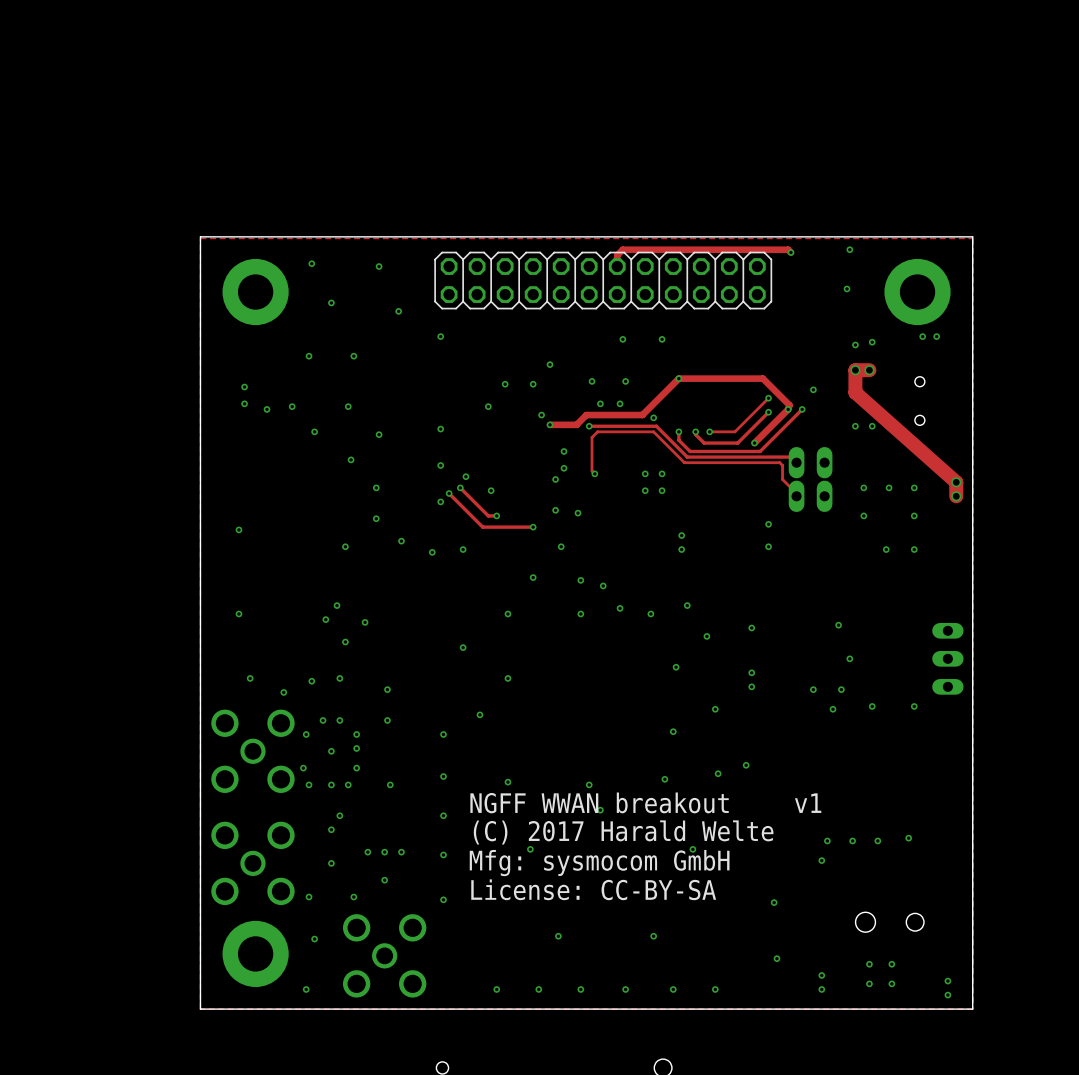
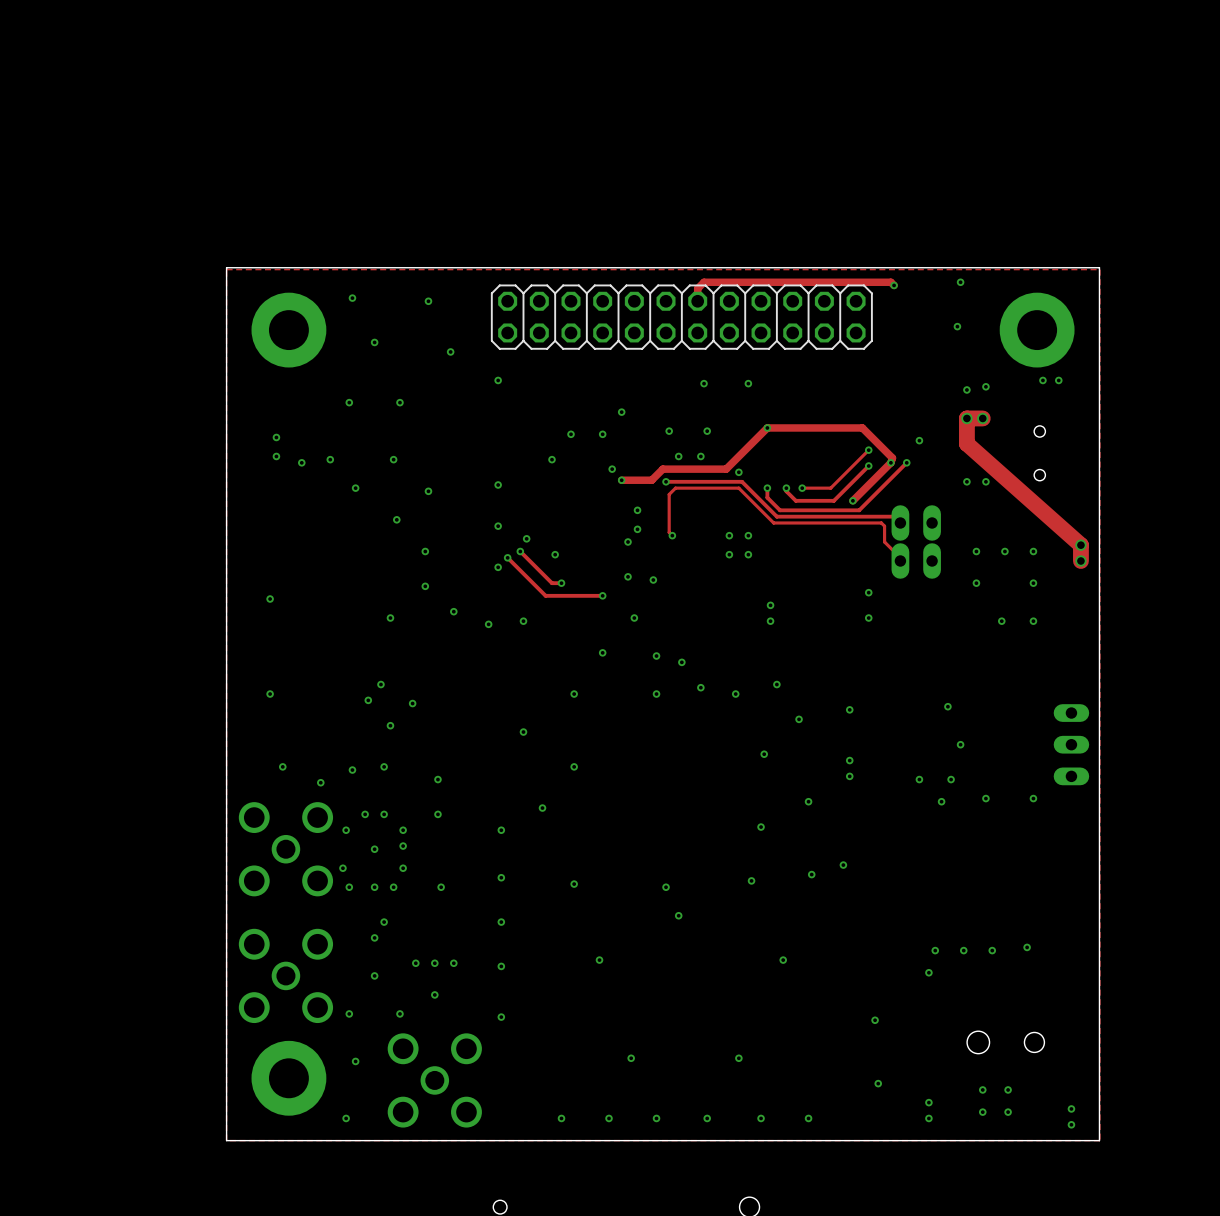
text: NGFF WWAN breakout (599, 802) -> none
text: v1 (808, 803) -> none
text: (C) 2017 Harald Welte (623, 832) -> none
text: Mfg: sysmocom GmbH (599, 863) -> none
text: License: CC-BY-SA (593, 889) -> none

